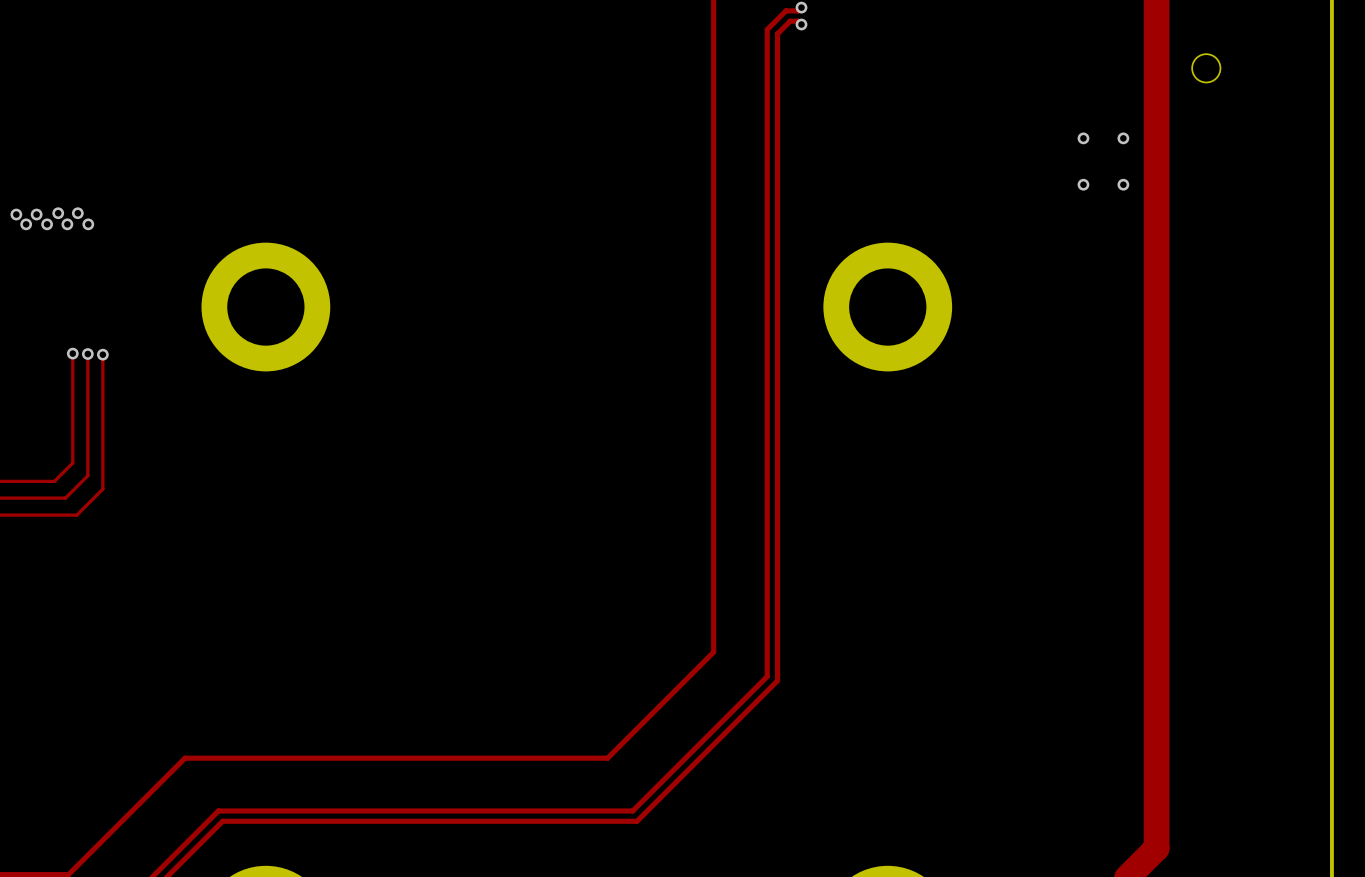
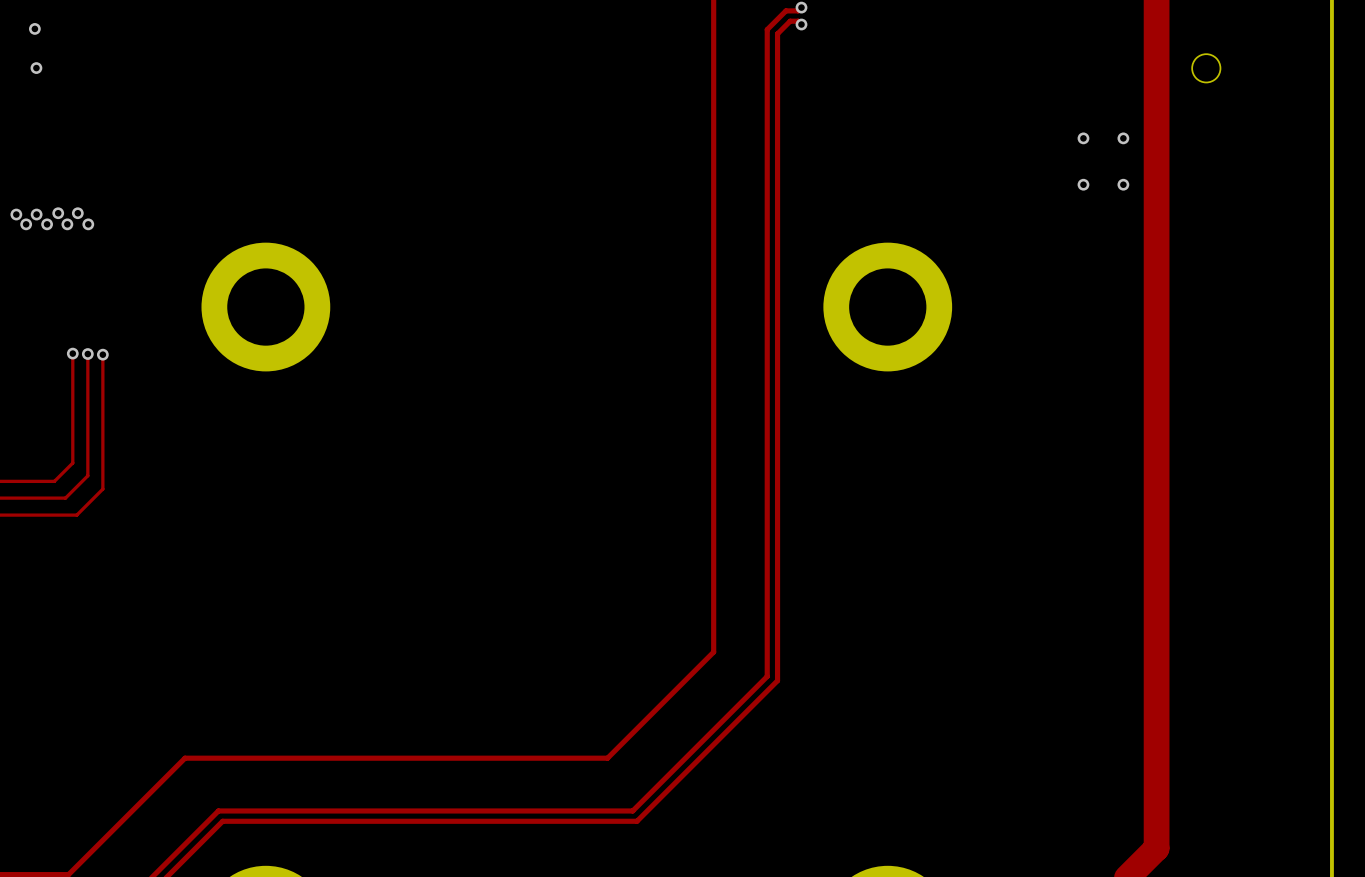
via: none -> (34, 28)
via: none -> (36, 68)

